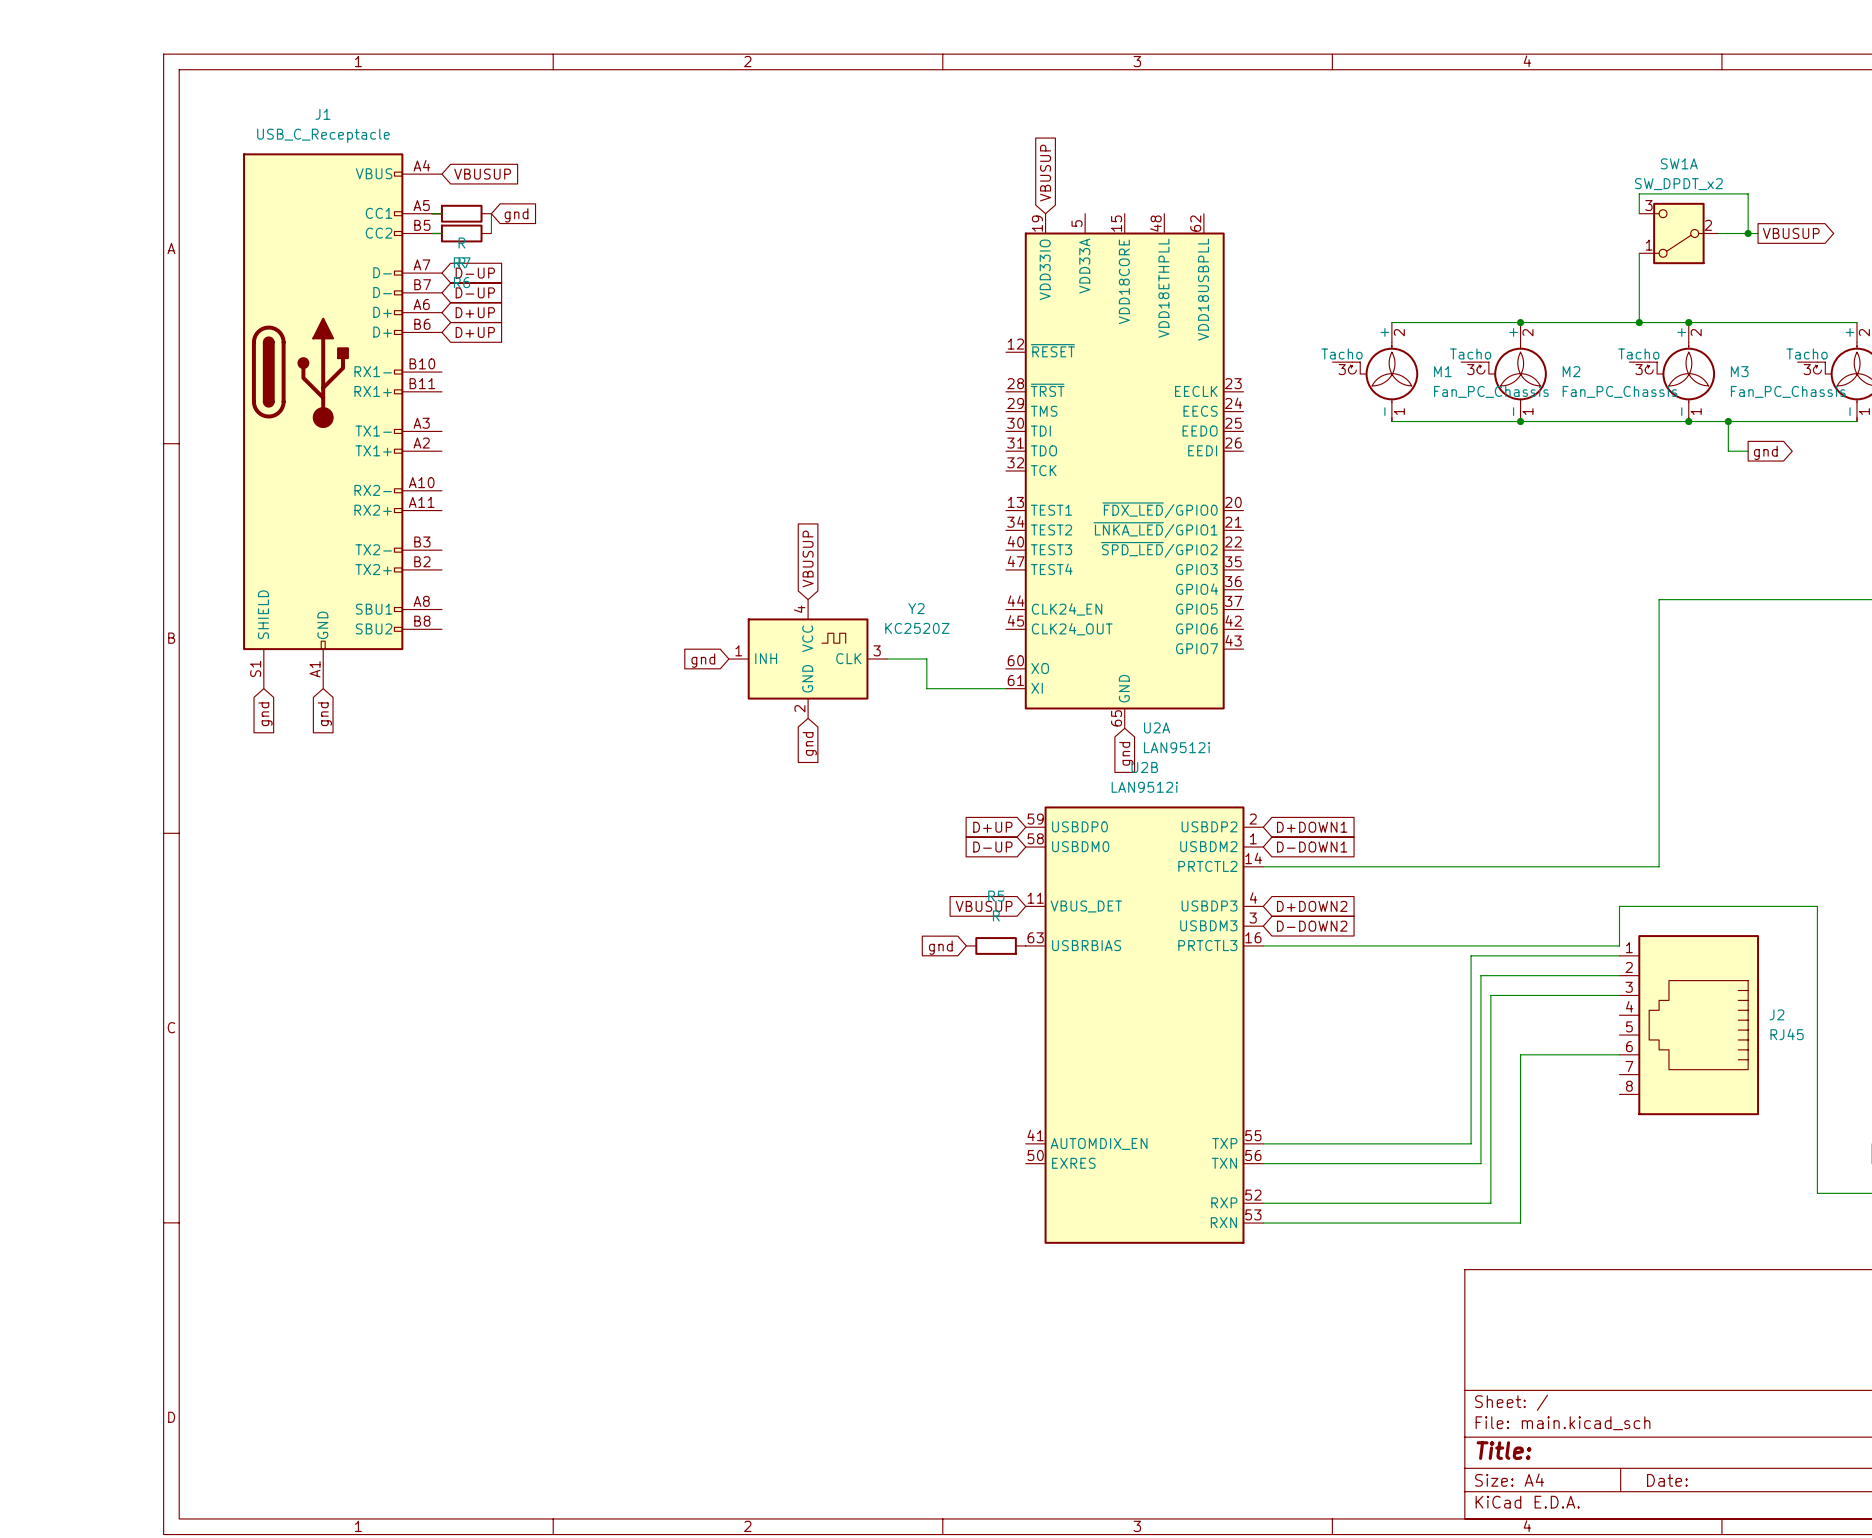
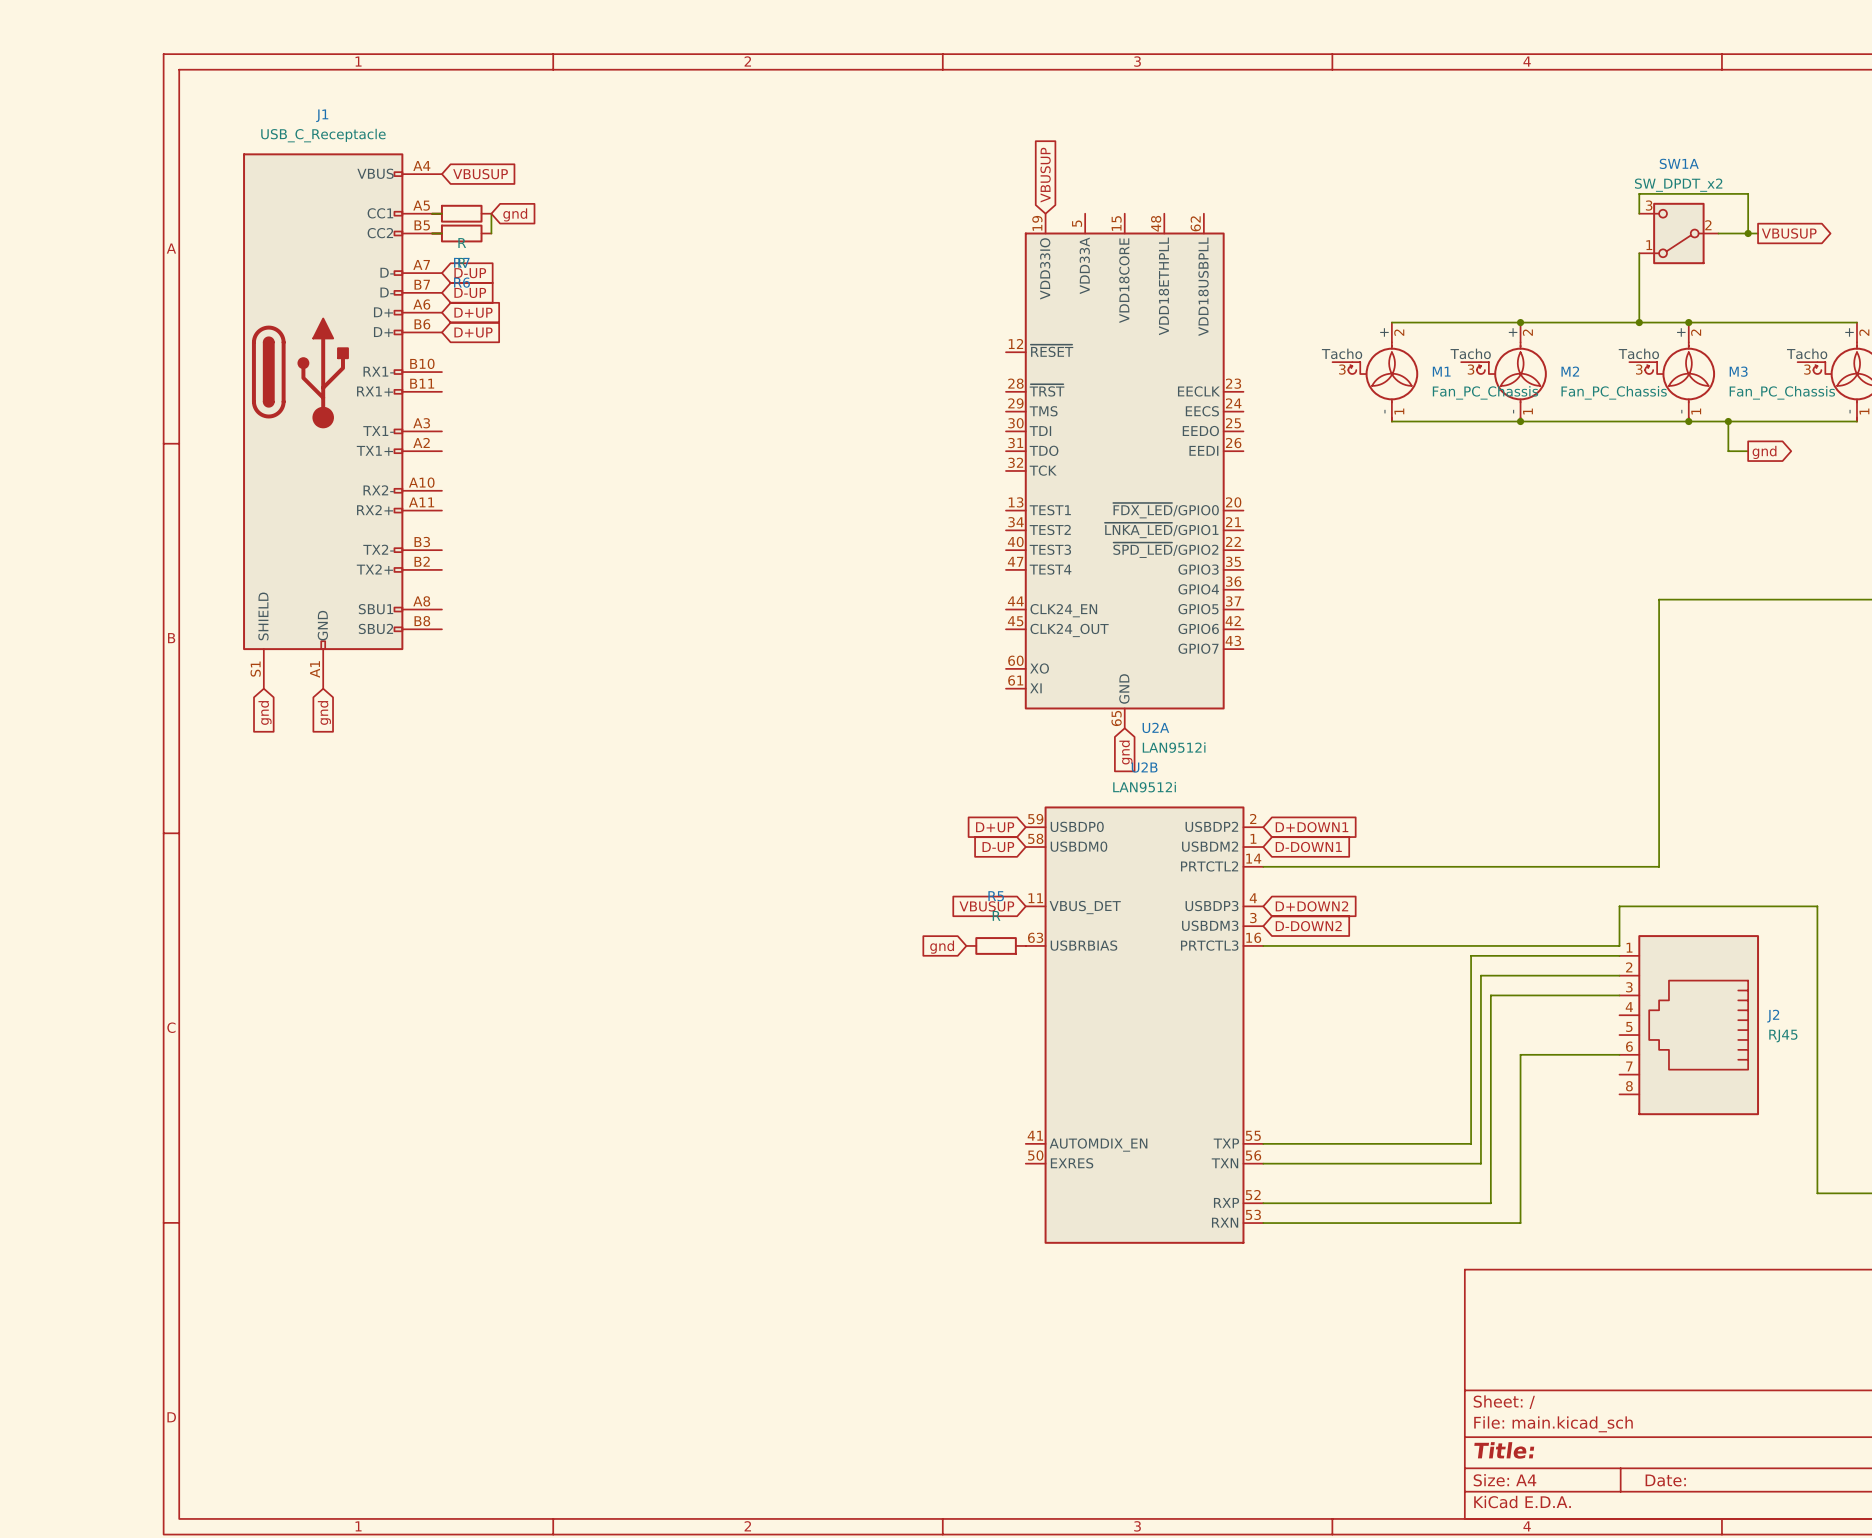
global label: VBUSUP (808, 558) -> none
Y2: KC2520Z (808, 659) -> none
wire: (887, 659) (926, 659) (926, 688) (1005, 688) -> none
global label: gnd (703, 660) -> none
global label: gnd (809, 743) -> none

